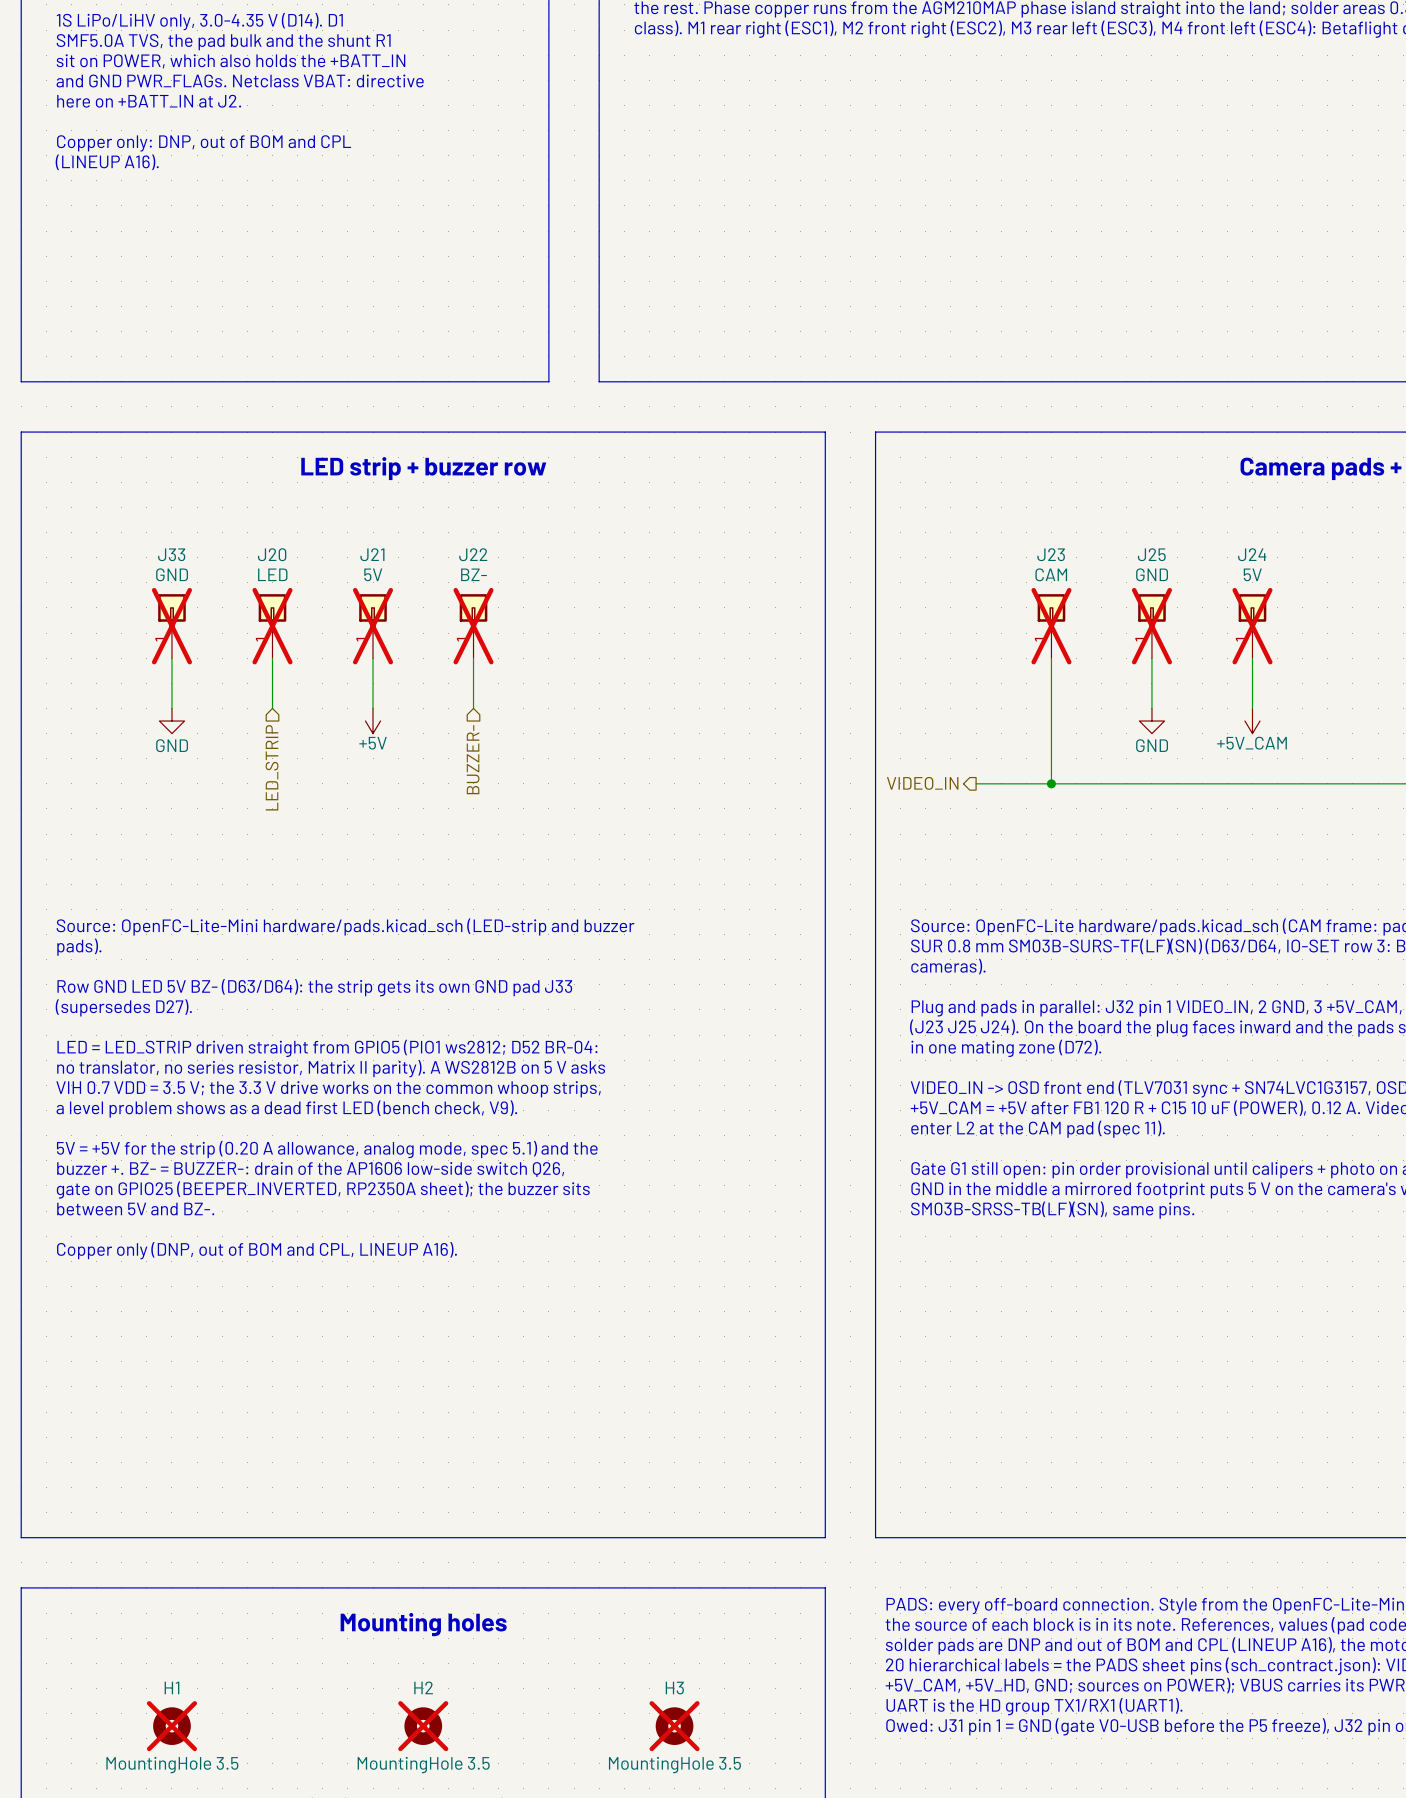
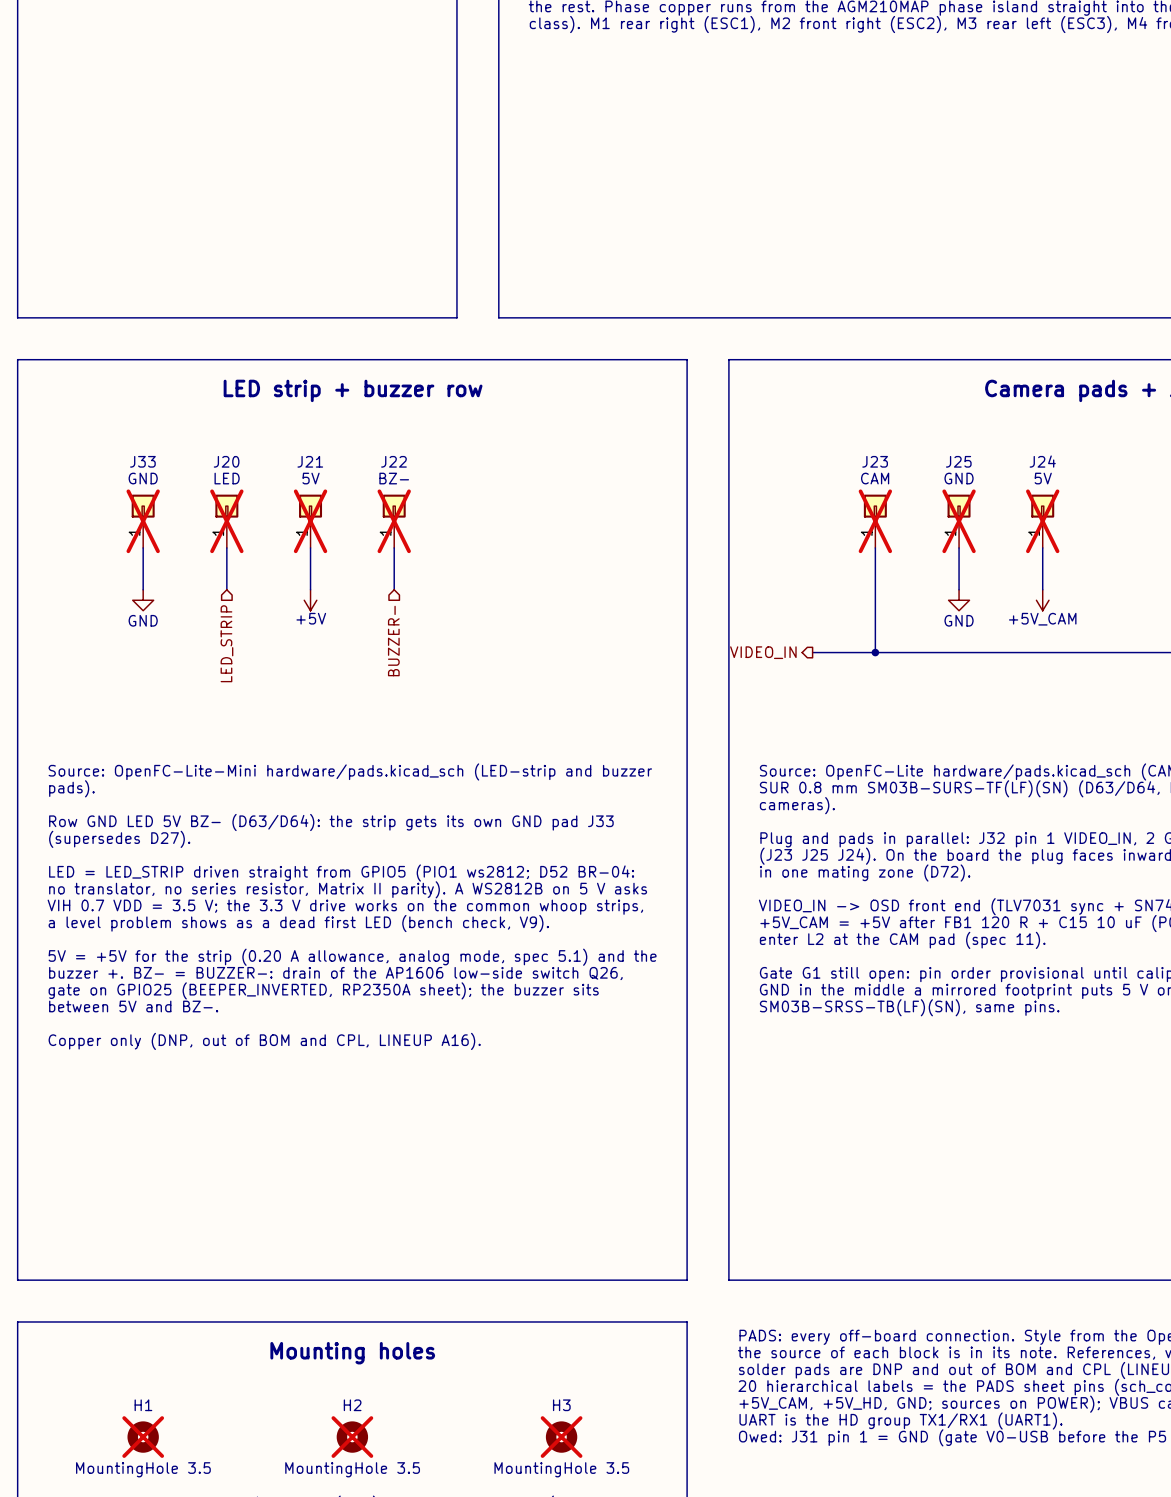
text: 1S LiPo/LiHV only, 3.0-4.35 V (D14). D1 (199, 21) -> none
text: SMF5.0A TVS, the pad bulk and the shunt R1 (223, 42) -> none
text: sit on POWER, which also holds the +BATT_IN (231, 61) -> none
text: and GND PWR_FLAGs. Netclass VBAT: directive (240, 80) -> none
text: here on +BATT_IN at J2. (149, 101) -> none
text: Copper only: DNP, out of BOM and CPL (204, 143) -> none
text: (LINEUP A16). (107, 162) -> none

